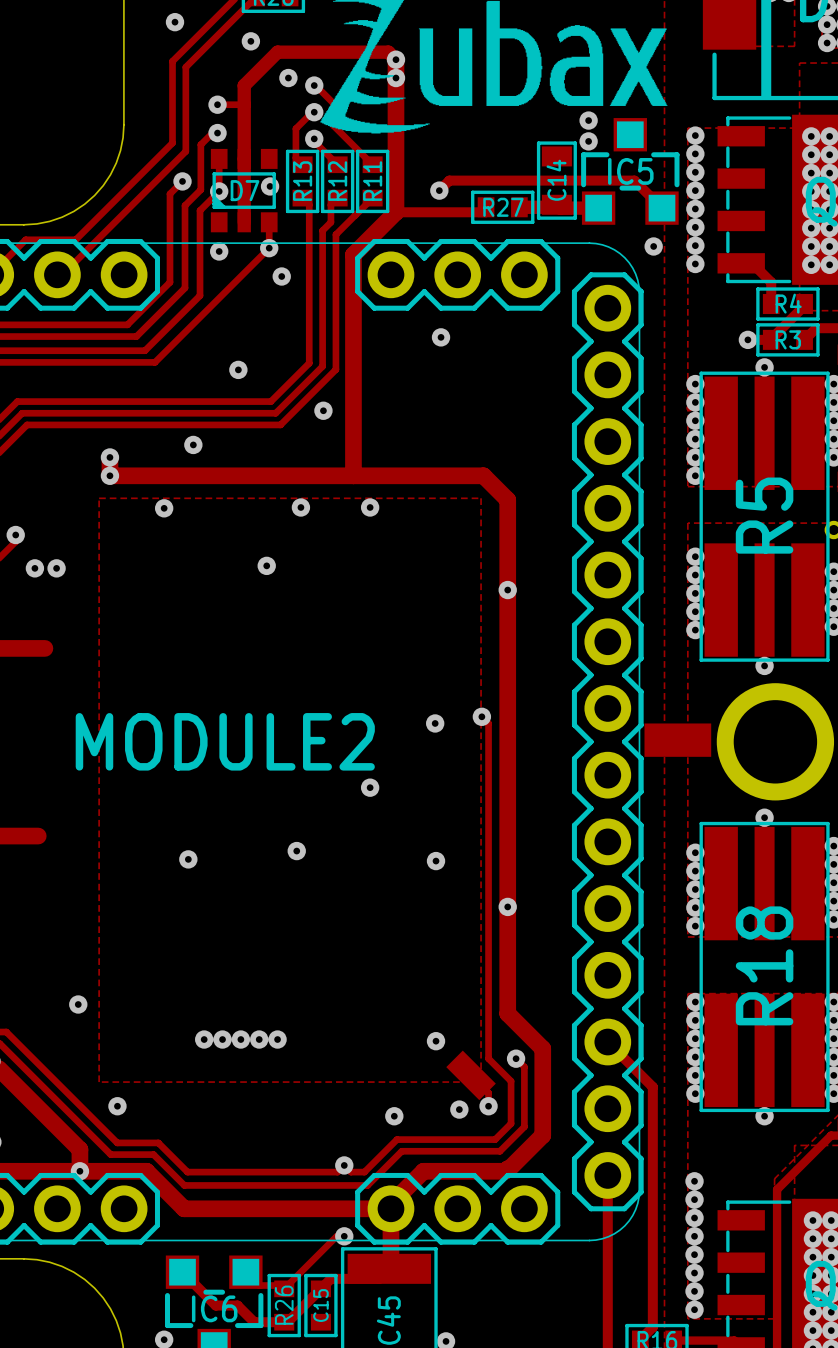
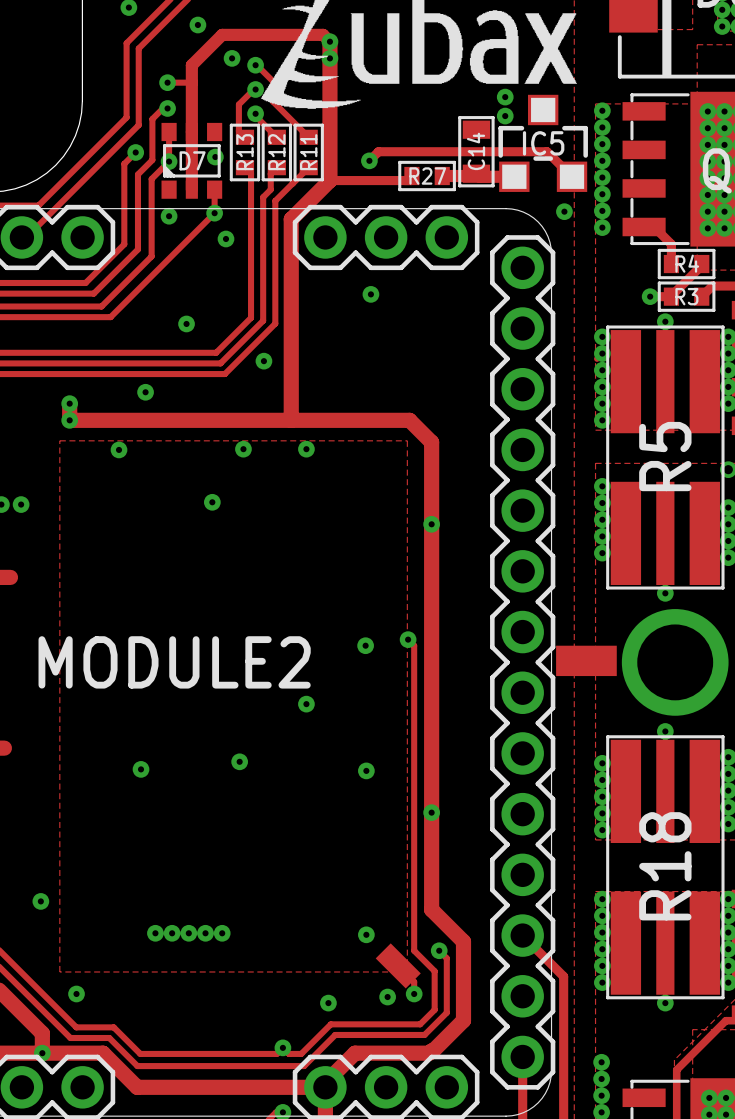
via: none -> (602, 486)
via: (695, 556) -> none
via: none -> (602, 503)
via: (695, 575) -> none
via: none -> (602, 519)
via: (695, 593) -> none
via: none -> (602, 536)
via: (695, 611) -> none
via: none -> (602, 553)
via: (695, 630) -> none

